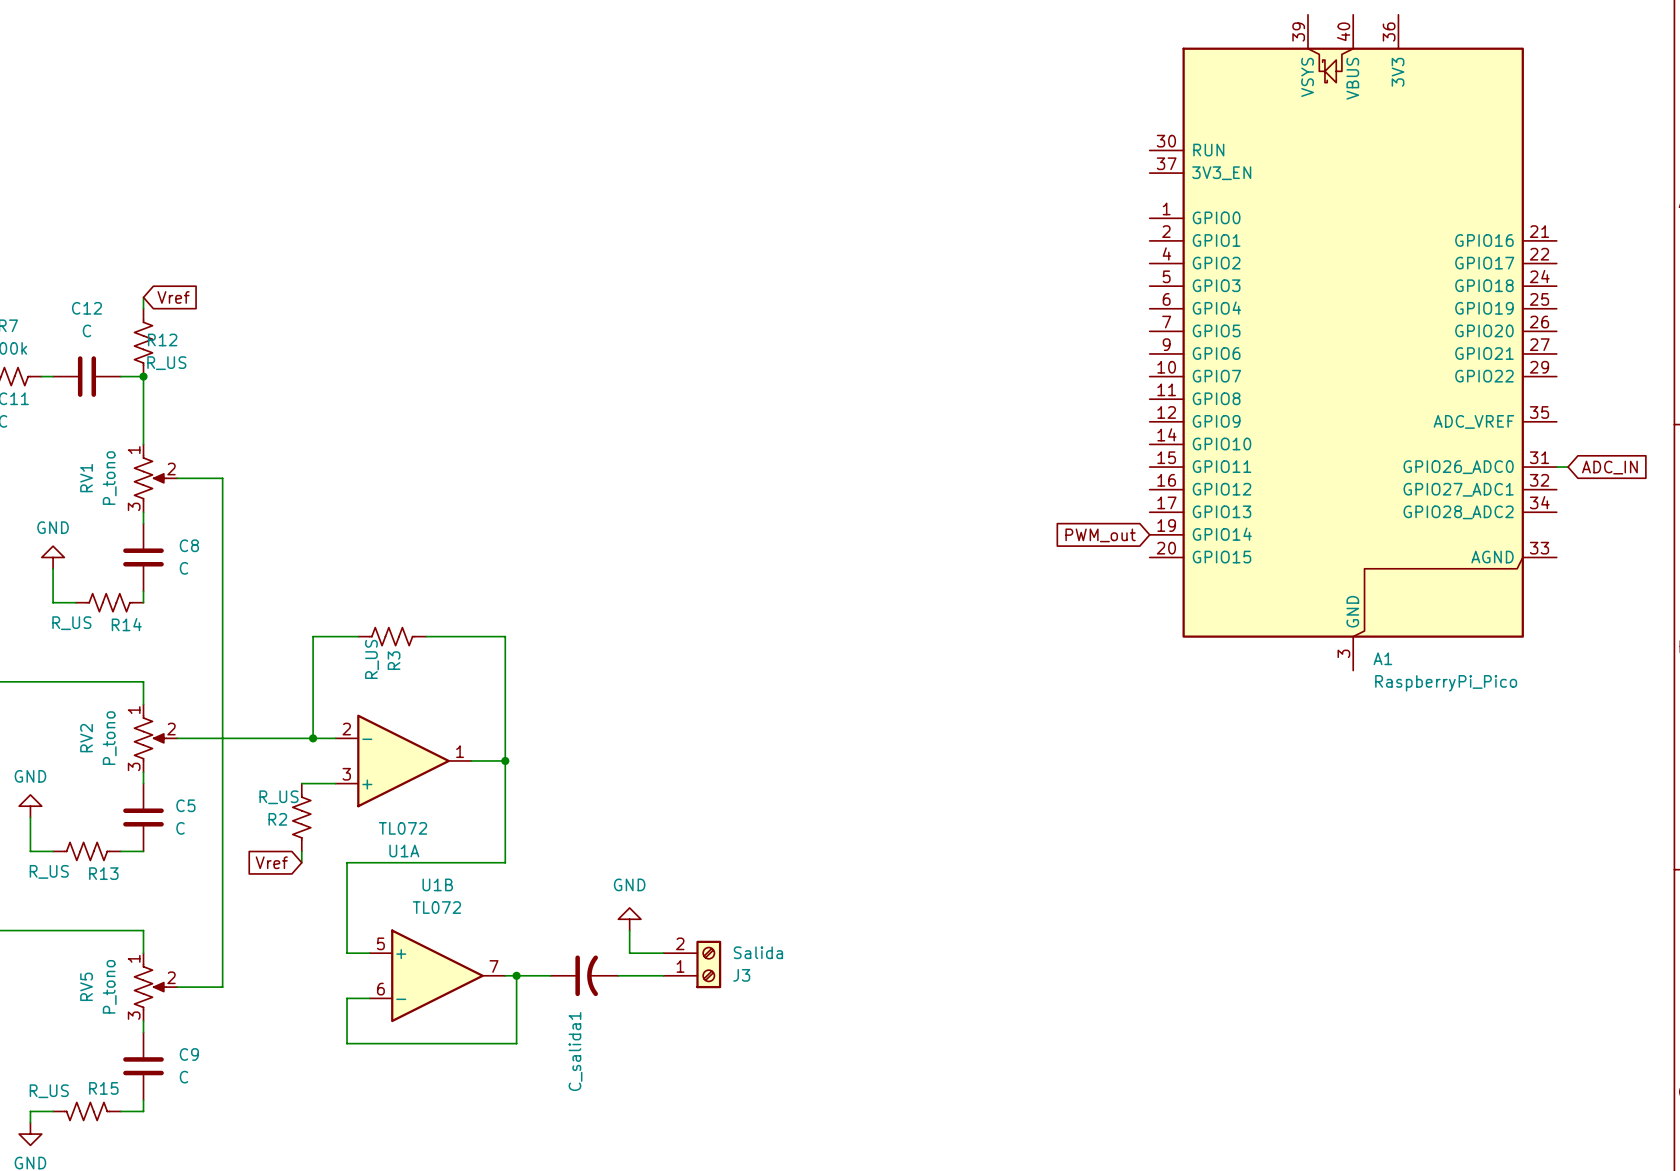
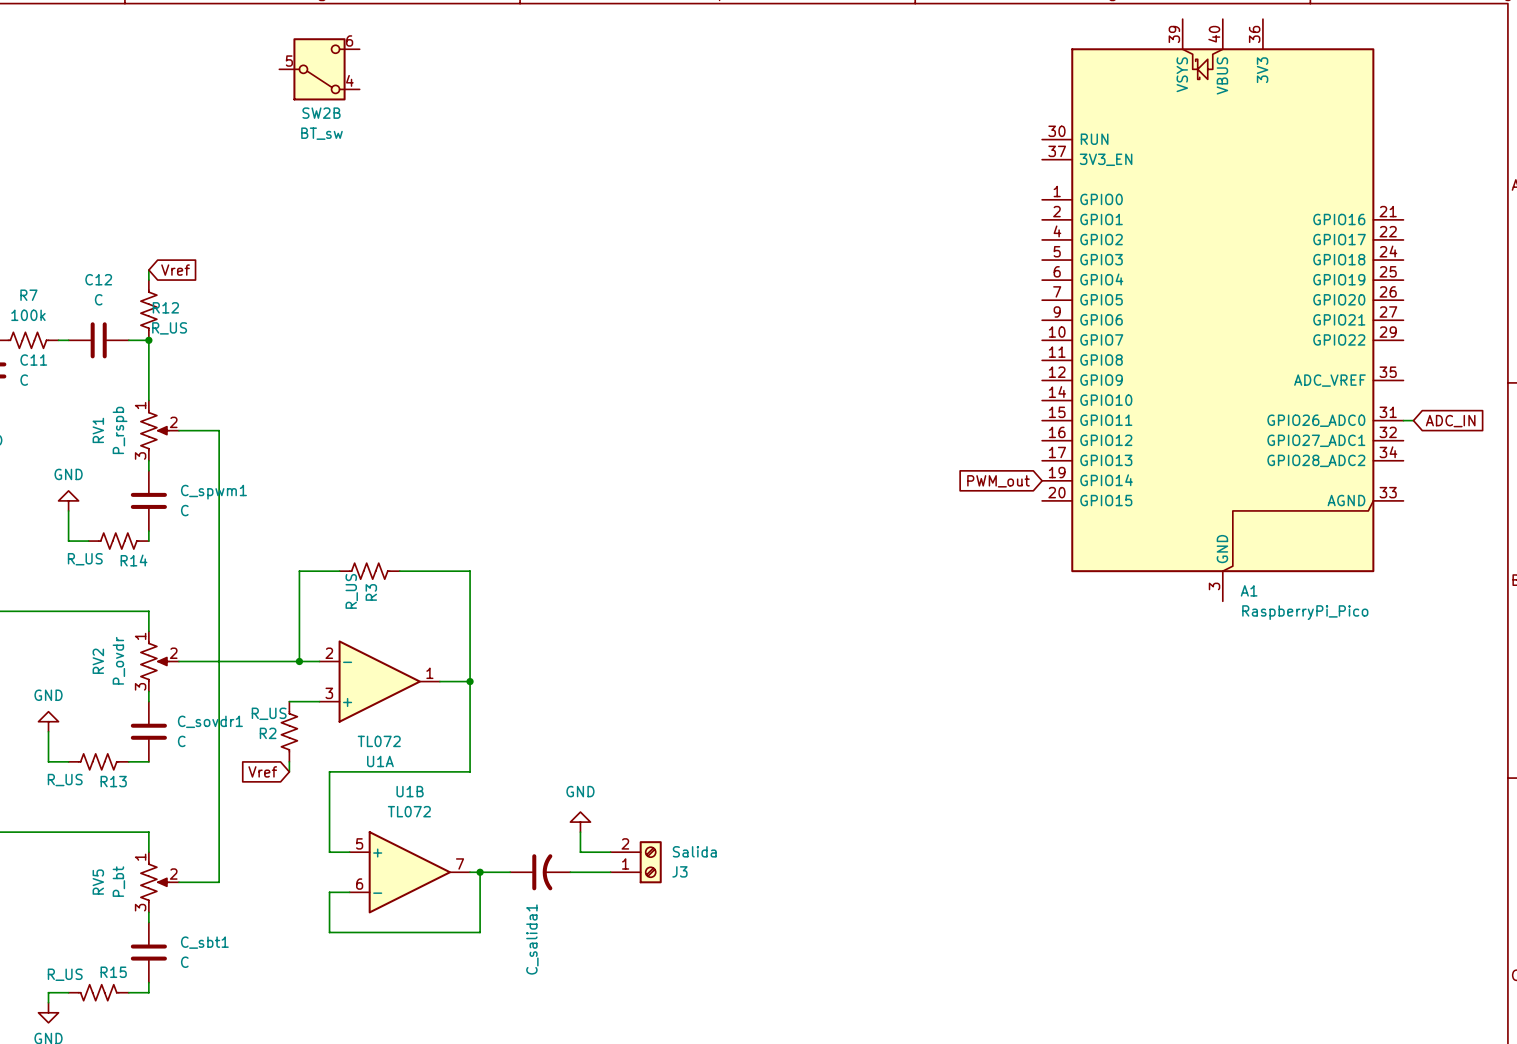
SW2B: none -> BT_sw (319, 69)
RV1 value: P_tono (109, 478) -> P_rspb (120, 430)
C8 name: C8 (189, 545) -> C_spwm1 (213, 492)
RV2 value: P_tono (109, 738) -> P_ovdr (118, 660)
C5 name: C5 (185, 805) -> C_sovdr1 (210, 721)
RV5 value: P_tono (109, 986) -> P_bt (118, 881)
C9 name: C9 (189, 1054) -> C_sbt1 (204, 942)

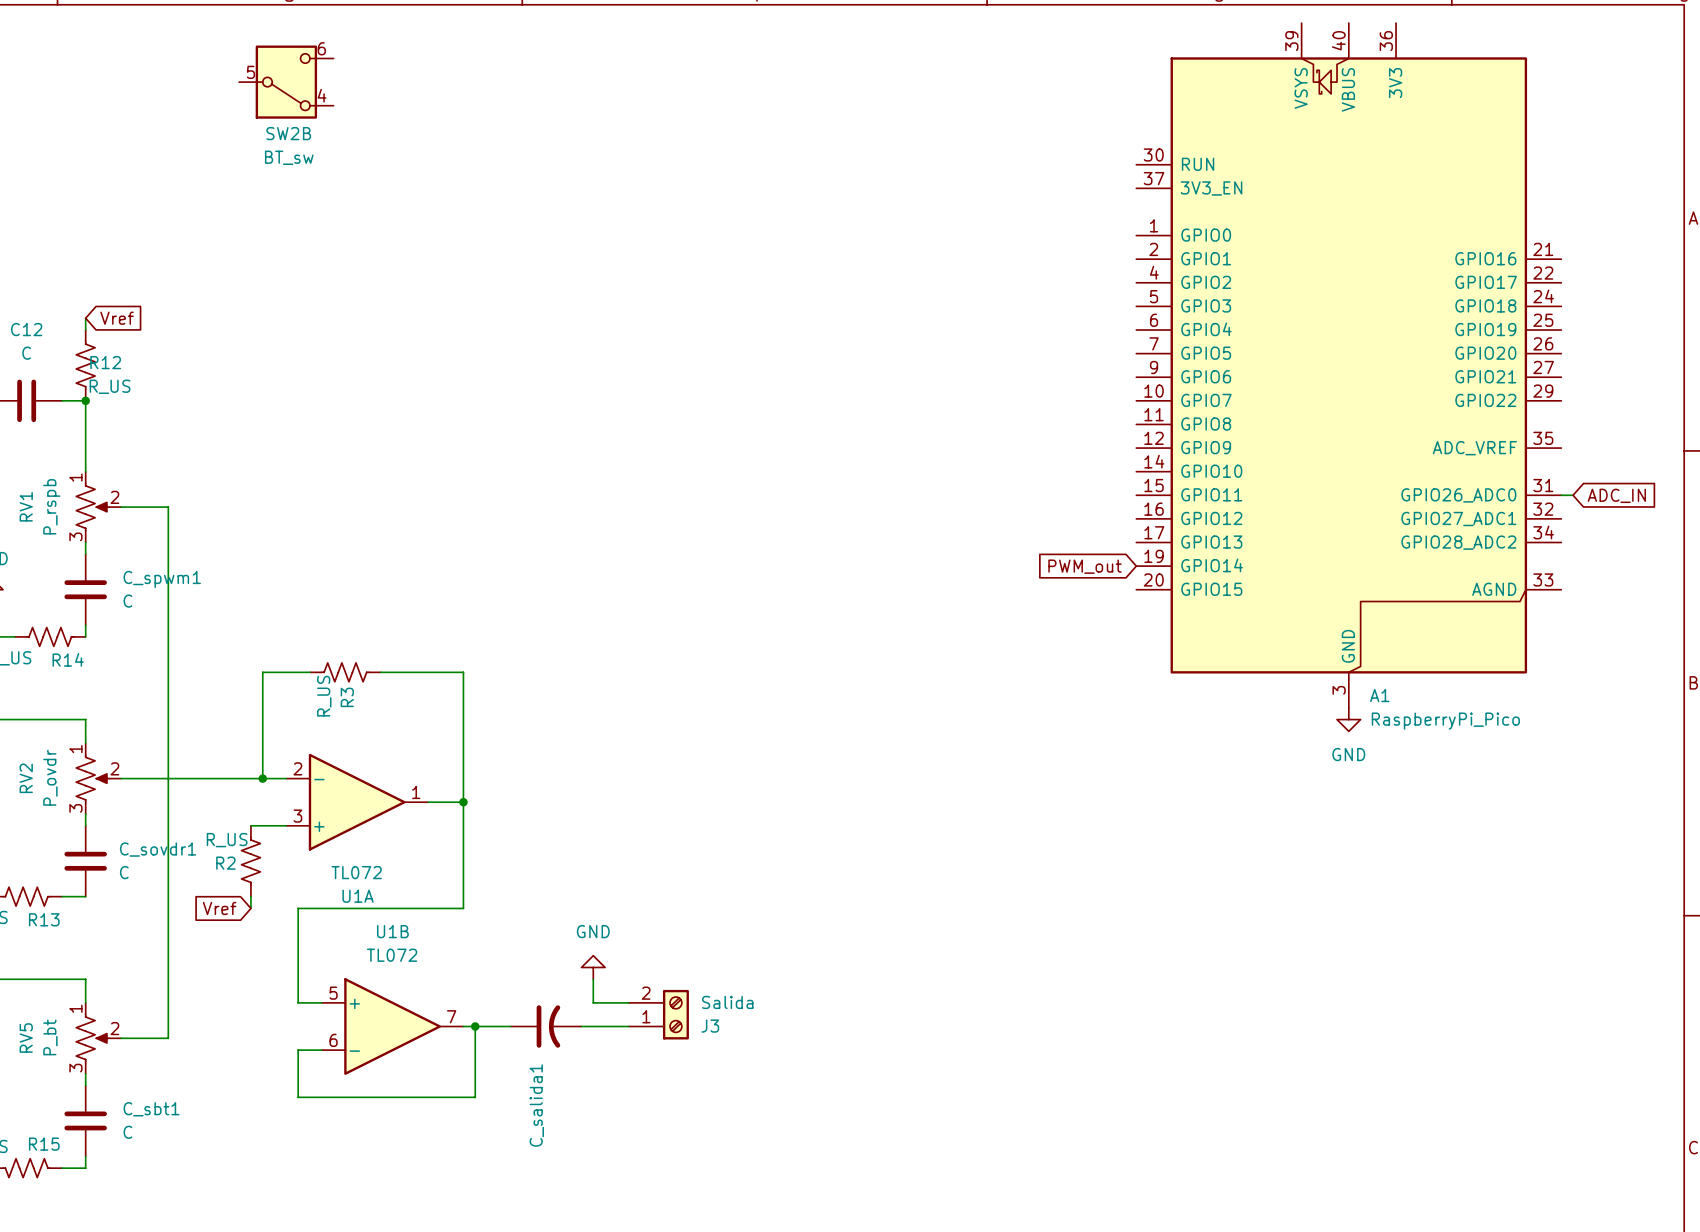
power symbol: none -> GND (1348, 719)

